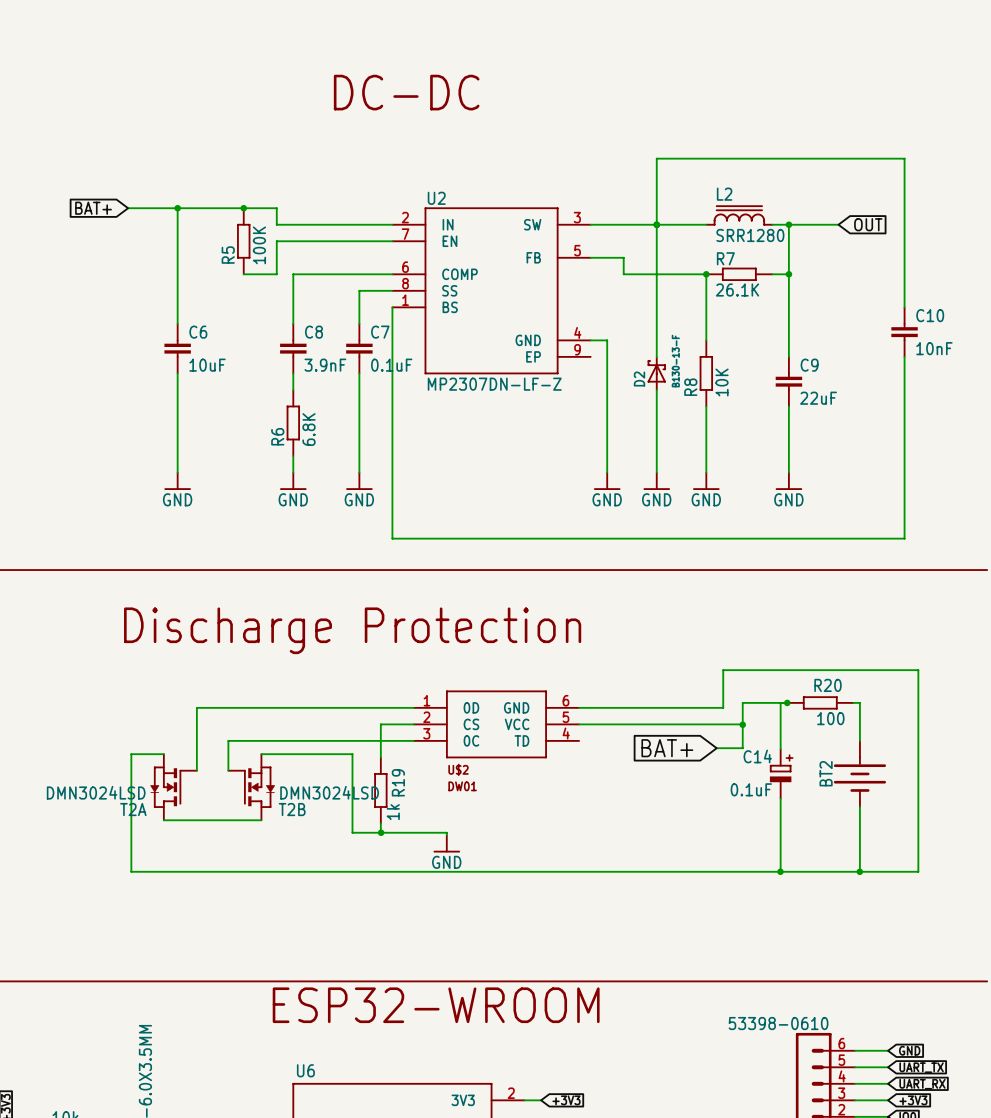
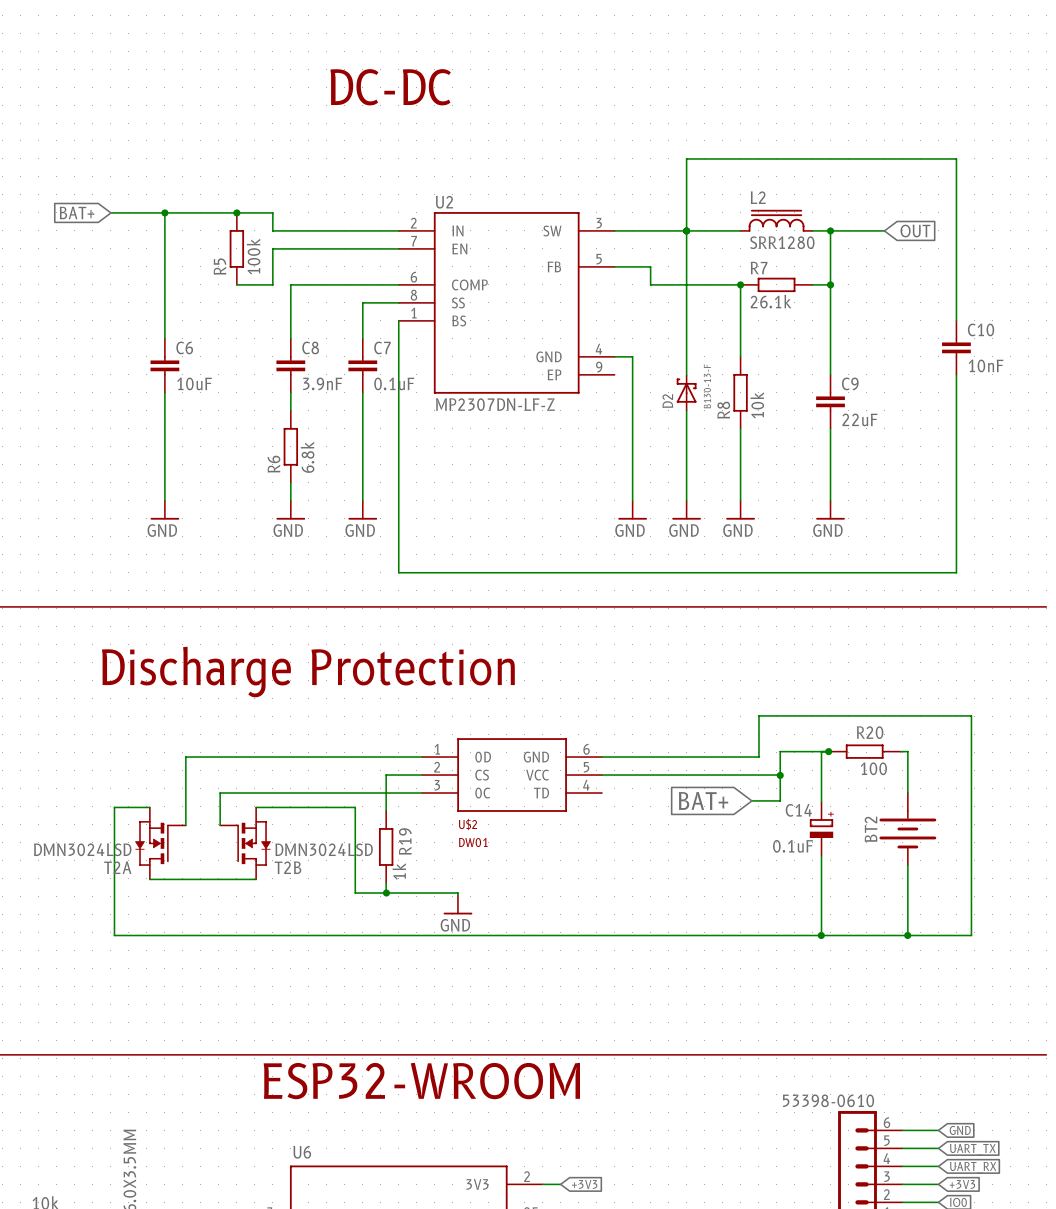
R5 value: 100K (259, 245) -> 100k (253, 256)
R7 value: 26.1K (737, 290) -> 26.1k (771, 301)
R8 value: 10K (722, 382) -> 10k (757, 405)
R6 value: 6.8K (308, 429) -> 6.8k (307, 457)

